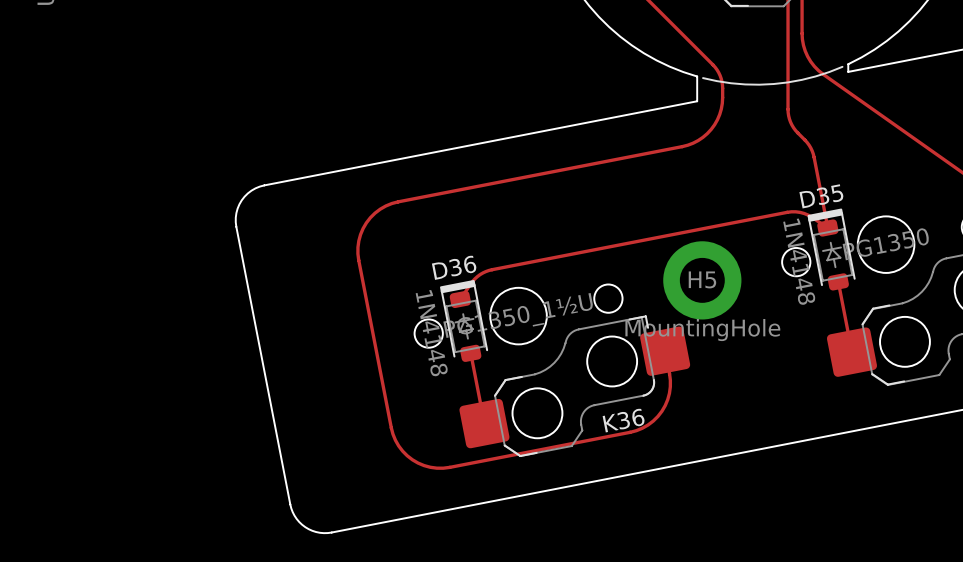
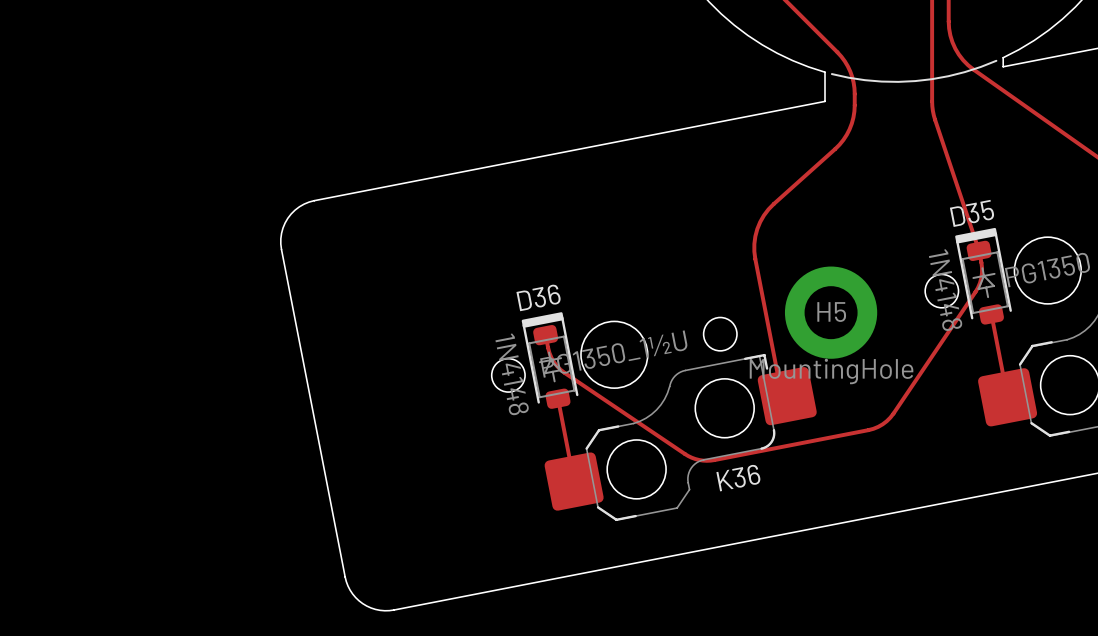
track: (707, 59) (717, 69) (721, 78) (721, 109) (711, 129) (693, 143) (391, 203) (380, 209) (370, 217) (363, 228) (358, 240) (358, 260) (392, 434) (402, 451) (412, 459) (424, 465) (436, 468) (449, 467) (630, 432) (642, 428) (657, 416) (667, 399) (670, 380) (665, 351) -> (837, 52) (847, 66) (853, 82) (854, 111) (849, 129) (835, 149) (768, 209) (760, 222) (755, 236) (755, 259) (781, 392) (787, 396)
track: (788, 101) (788, 115) (791, 125) (809, 145) (813, 154) (827, 228) (804, 213) (787, 212) (488, 270) (475, 278) (460, 299) -> (932, 101) (935, 120) (979, 250) (982, 267) (981, 278) (975, 292) (893, 413) (882, 424) (868, 430) (714, 460) (695, 459) (685, 454) (560, 369) (551, 357) (545, 335)

